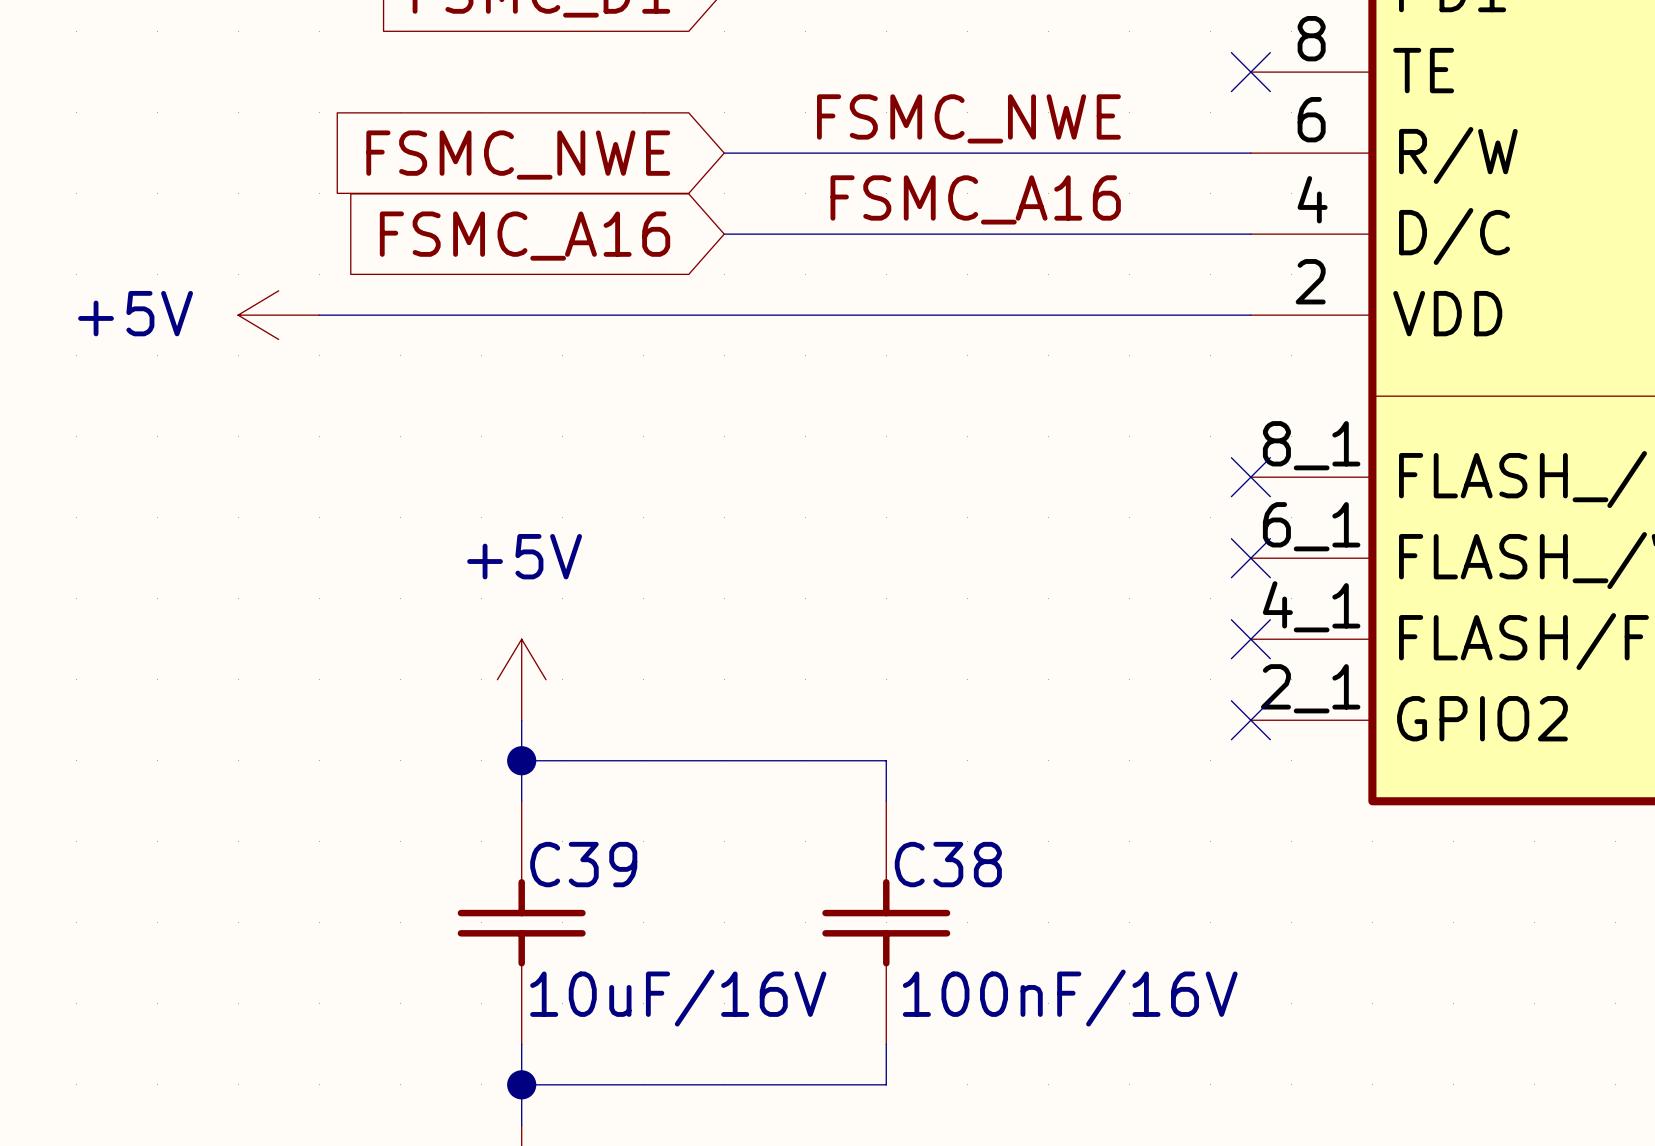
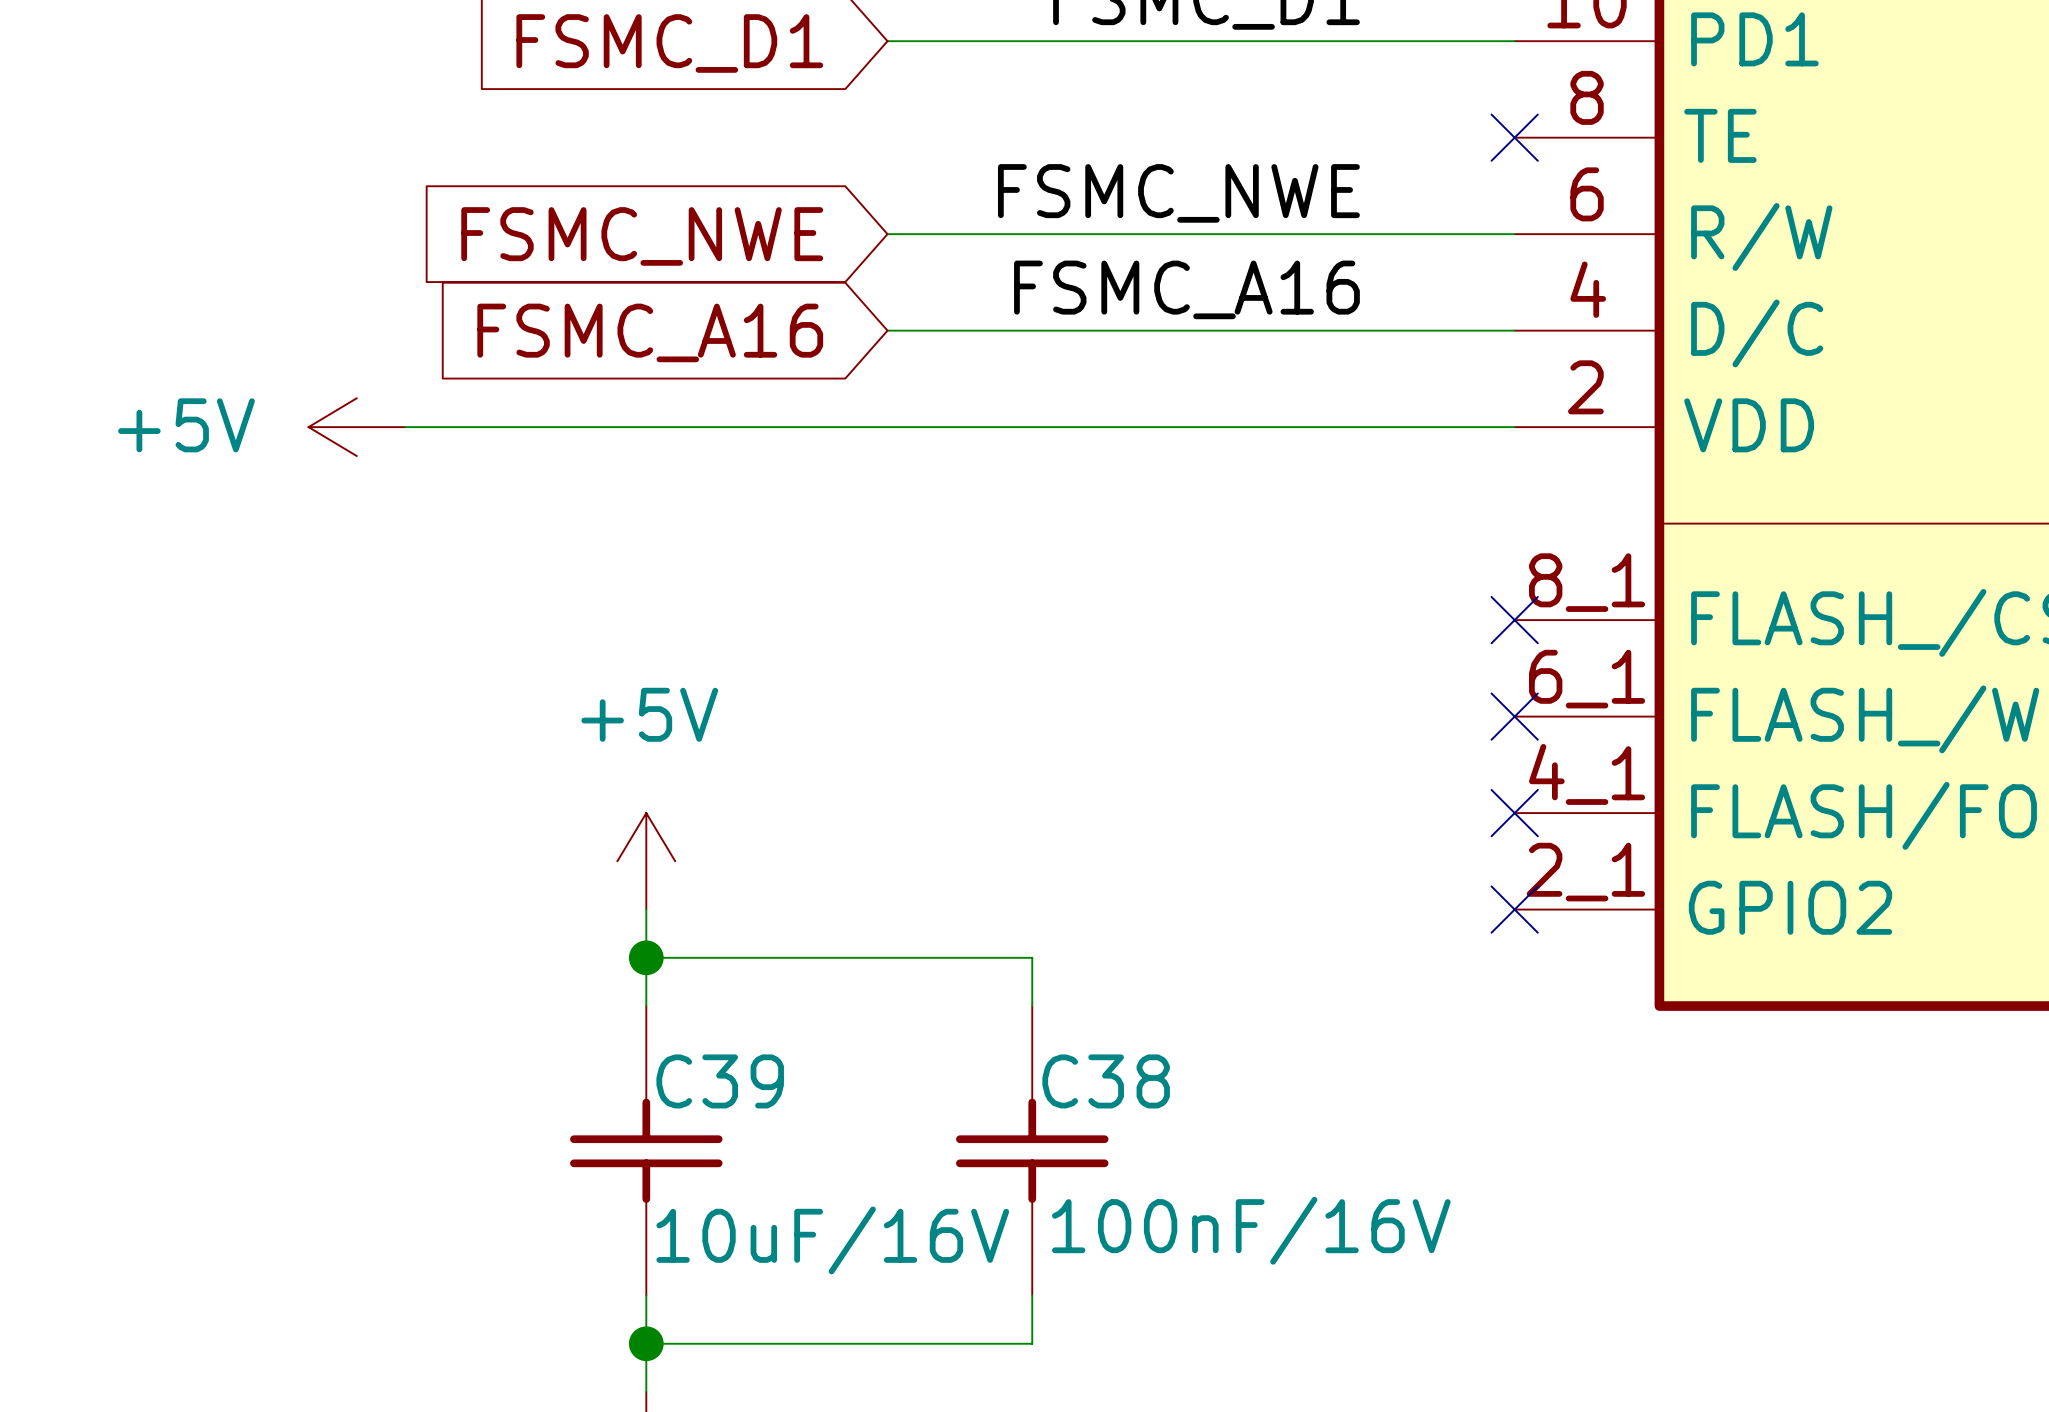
wire: (845, 760) (886, 760) (886, 801) -> (1032, 957) (1032, 1006)
C38 position: (886, 922) -> (1032, 1150)
C38 value position: 100nF/16V (1070, 998) -> 100nF/16V (1251, 1230)
wire: (886, 1044) (886, 1084) (845, 1084) -> (1032, 1295) (1032, 1343)

